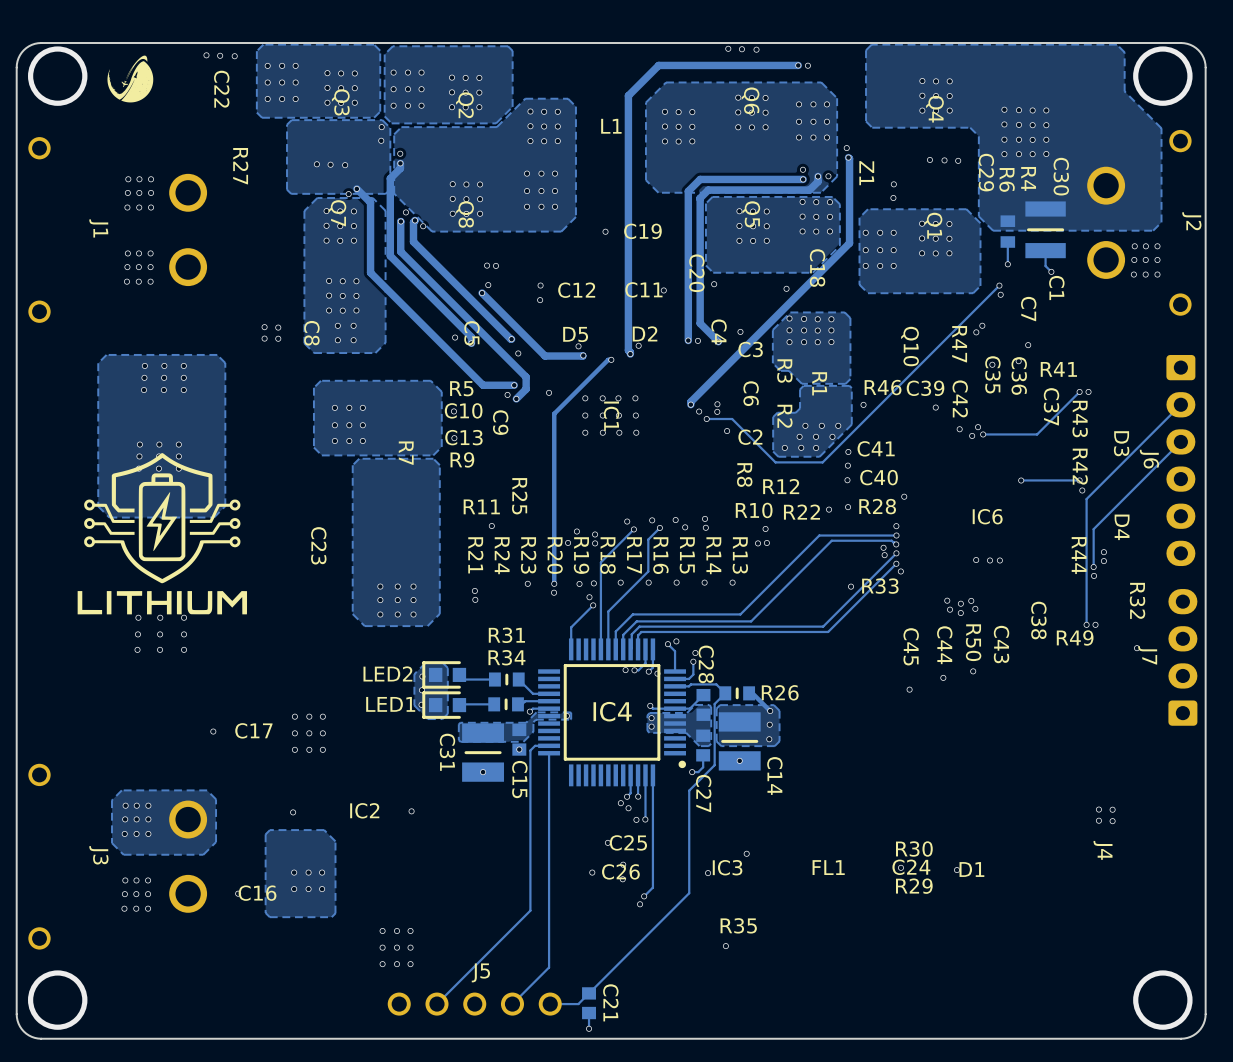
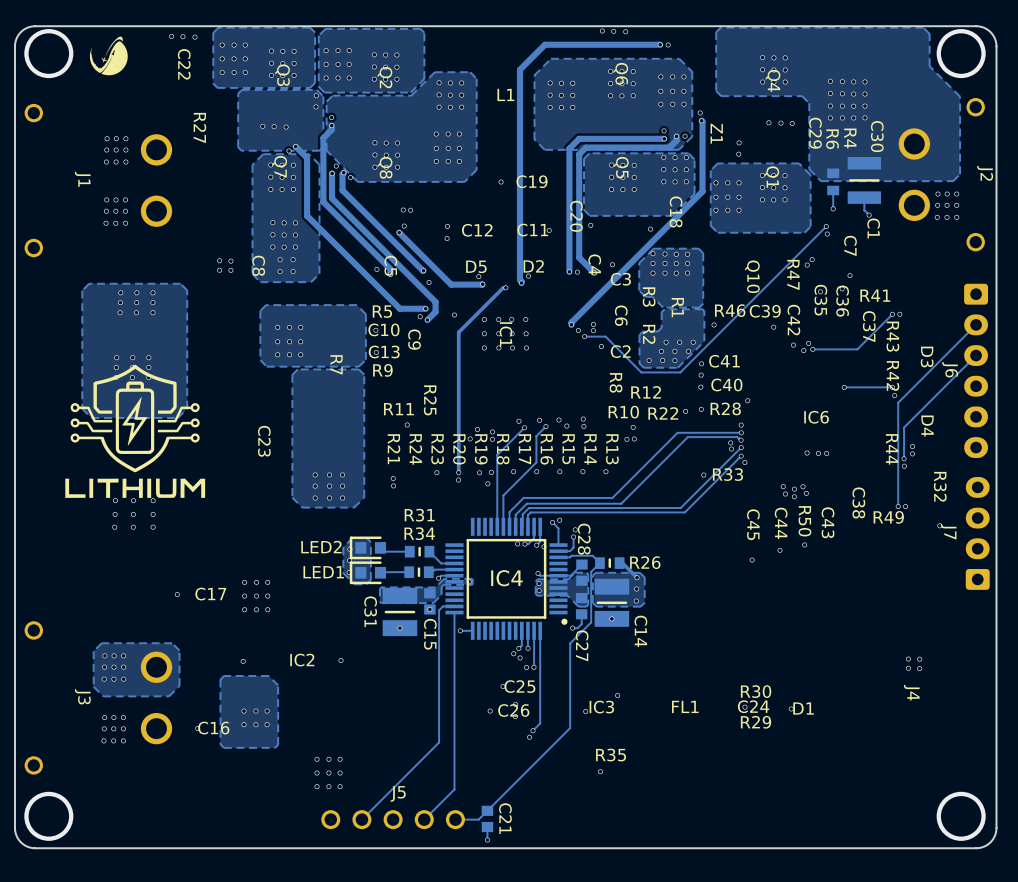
track: (593, 605) (571, 627) (571, 649) -> none
via: (593, 605) -> none
via: none -> (460, 630)
track: none -> (472, 630) (460, 630)

